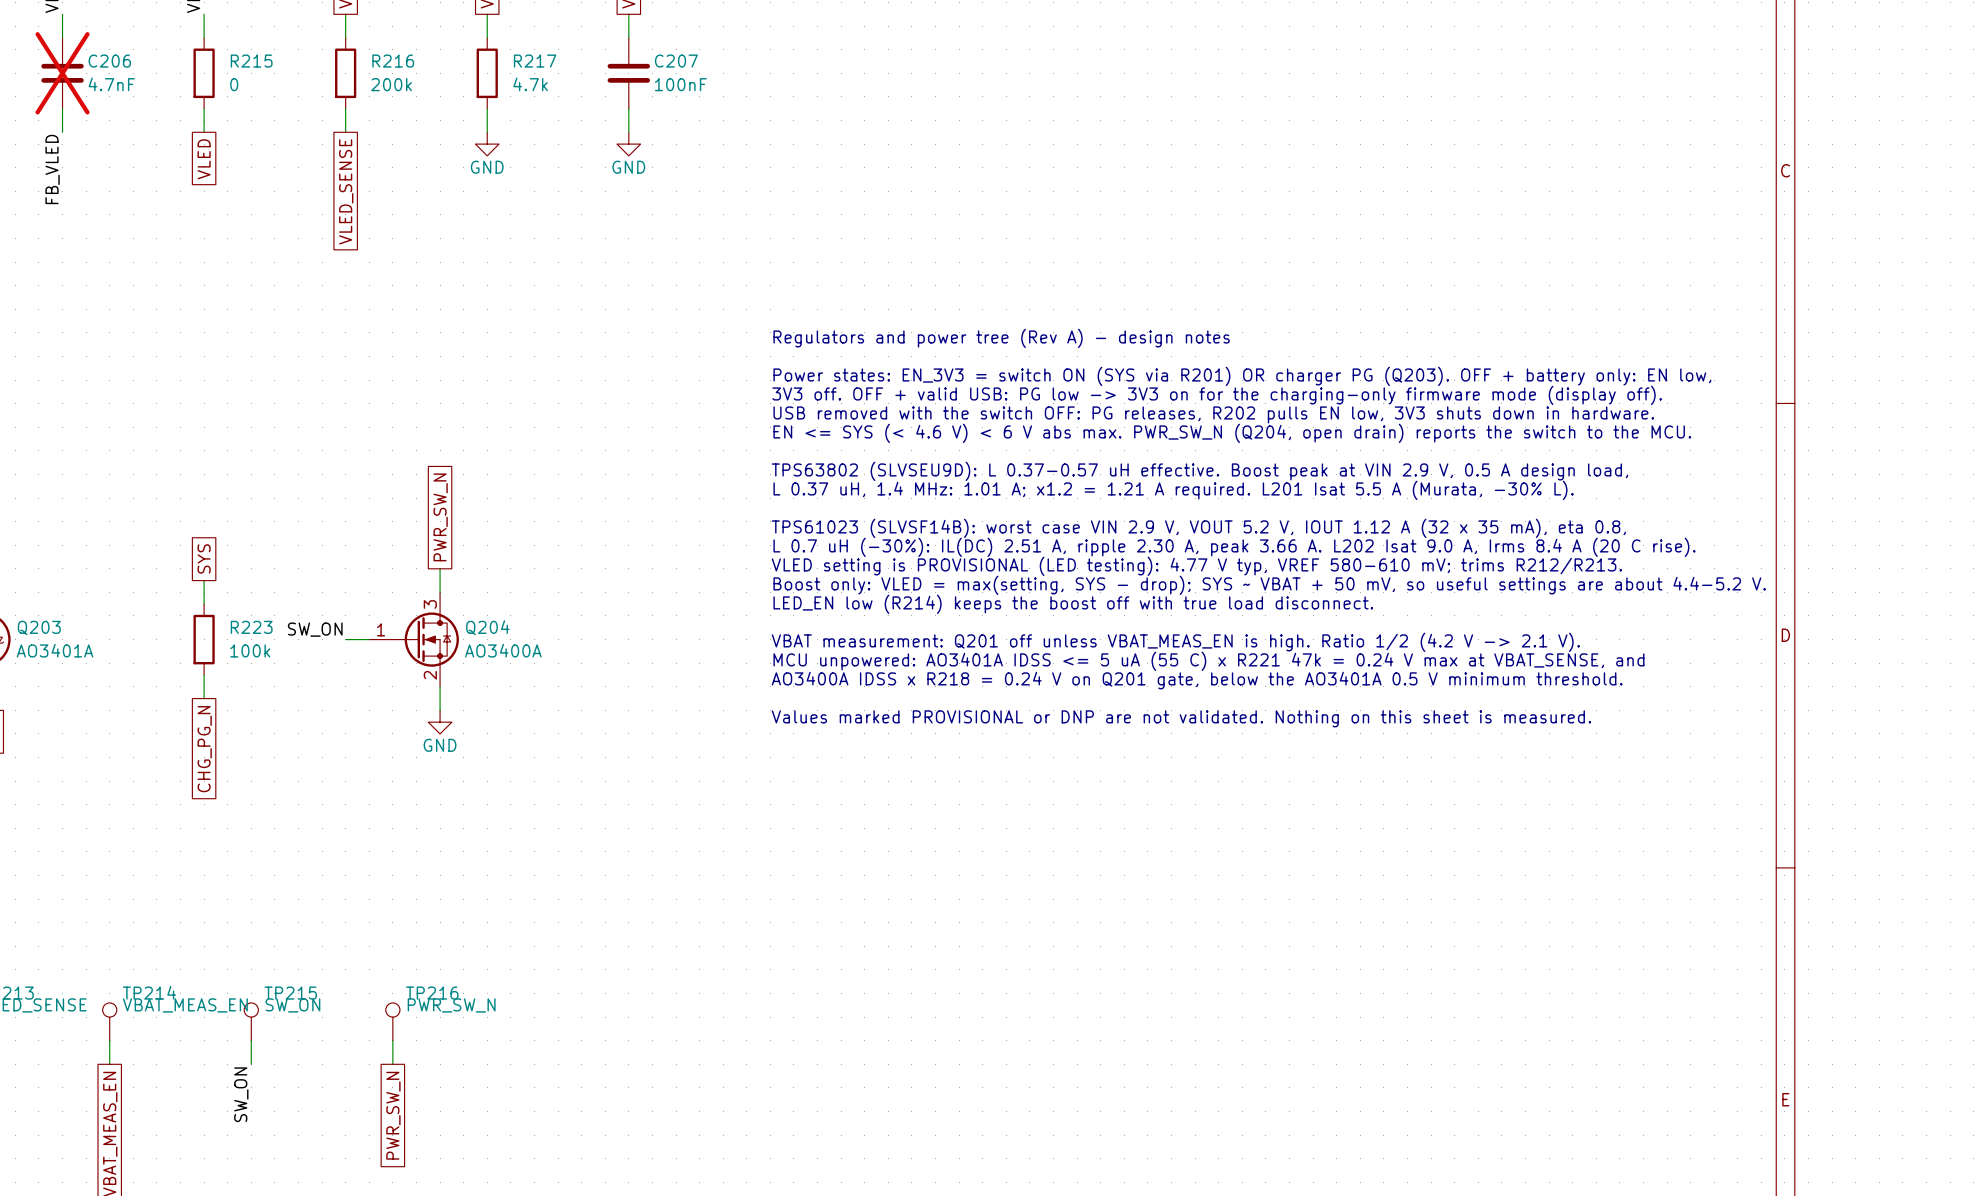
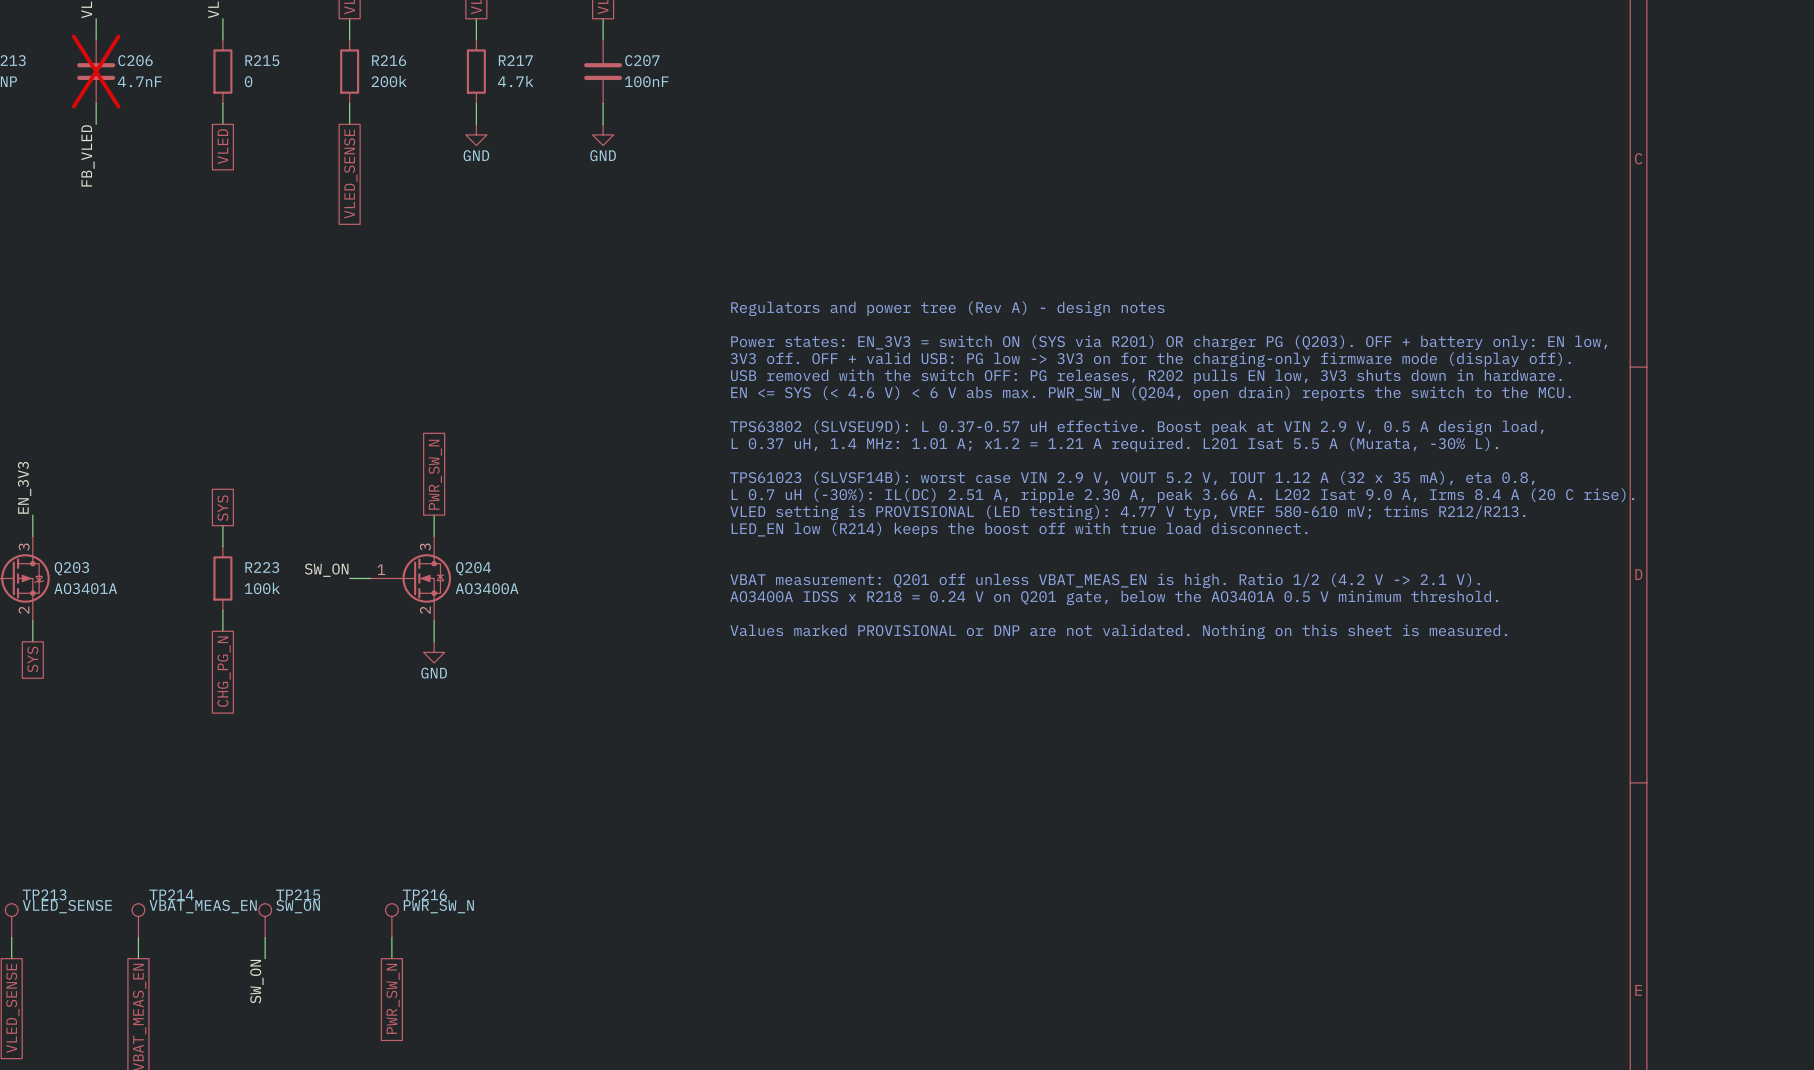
text: Boost only: VLED = max(setting, SYS - drop); SYS ~ VBAT + 50 mV, so useful settings are about 4.4-5.2 V. (1269, 585) -> LED_EN low (R214) keeps the boost off with true load disconnect. (1019, 529)
text: LED_EN low (R214) keeps the boost off with true load disconnect. (1073, 604) -> none
text: MCU unpowered: AO3401A IDSS <= 5 uA (55 C) x R221 47k = 0.24 V max at VBAT_SENSE, and (1208, 661) -> AO3400A IDSS x R218 = 0.24 V on Q201 gate, below the AO3401A 0.5 V minimum threshold. (1114, 597)
text: AO3400A IDSS x R218 = 0.24 V on Q201 gate, below the AO3401A 0.5 V minimum threshold. (1197, 680) -> none
text position: Values marked PROVISIONAL or DNP are not validated. Nothing on this sheet is measured. (1181, 718) -> Values marked PROVISIONAL or DNP are not validated. Nothing on this sheet is measured. (1118, 631)

